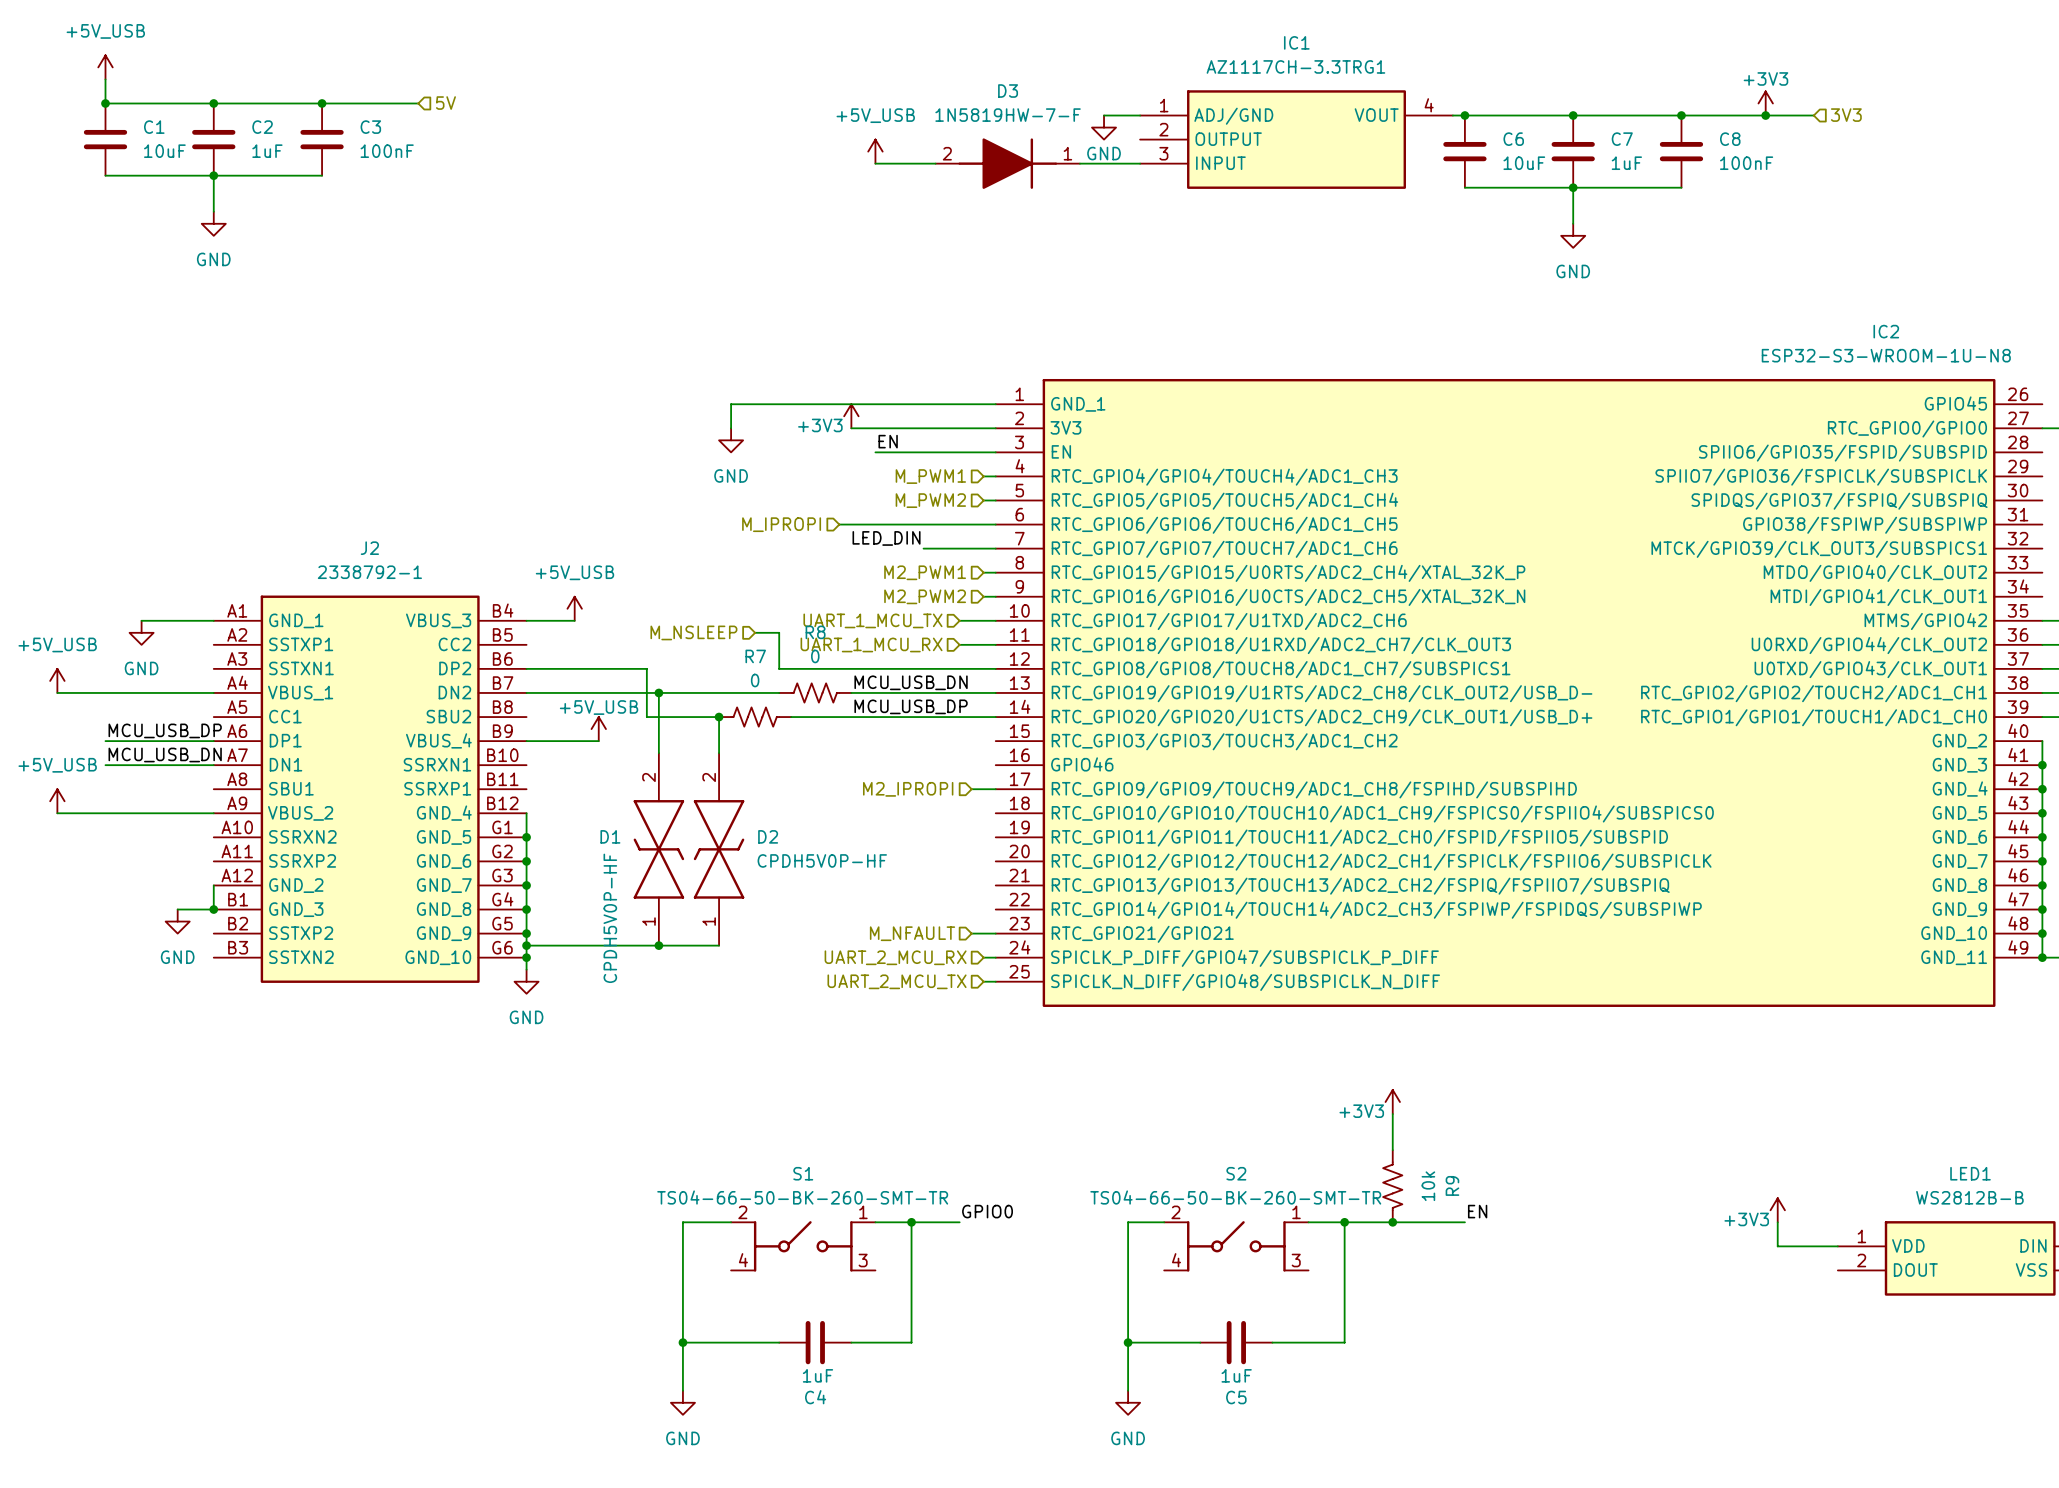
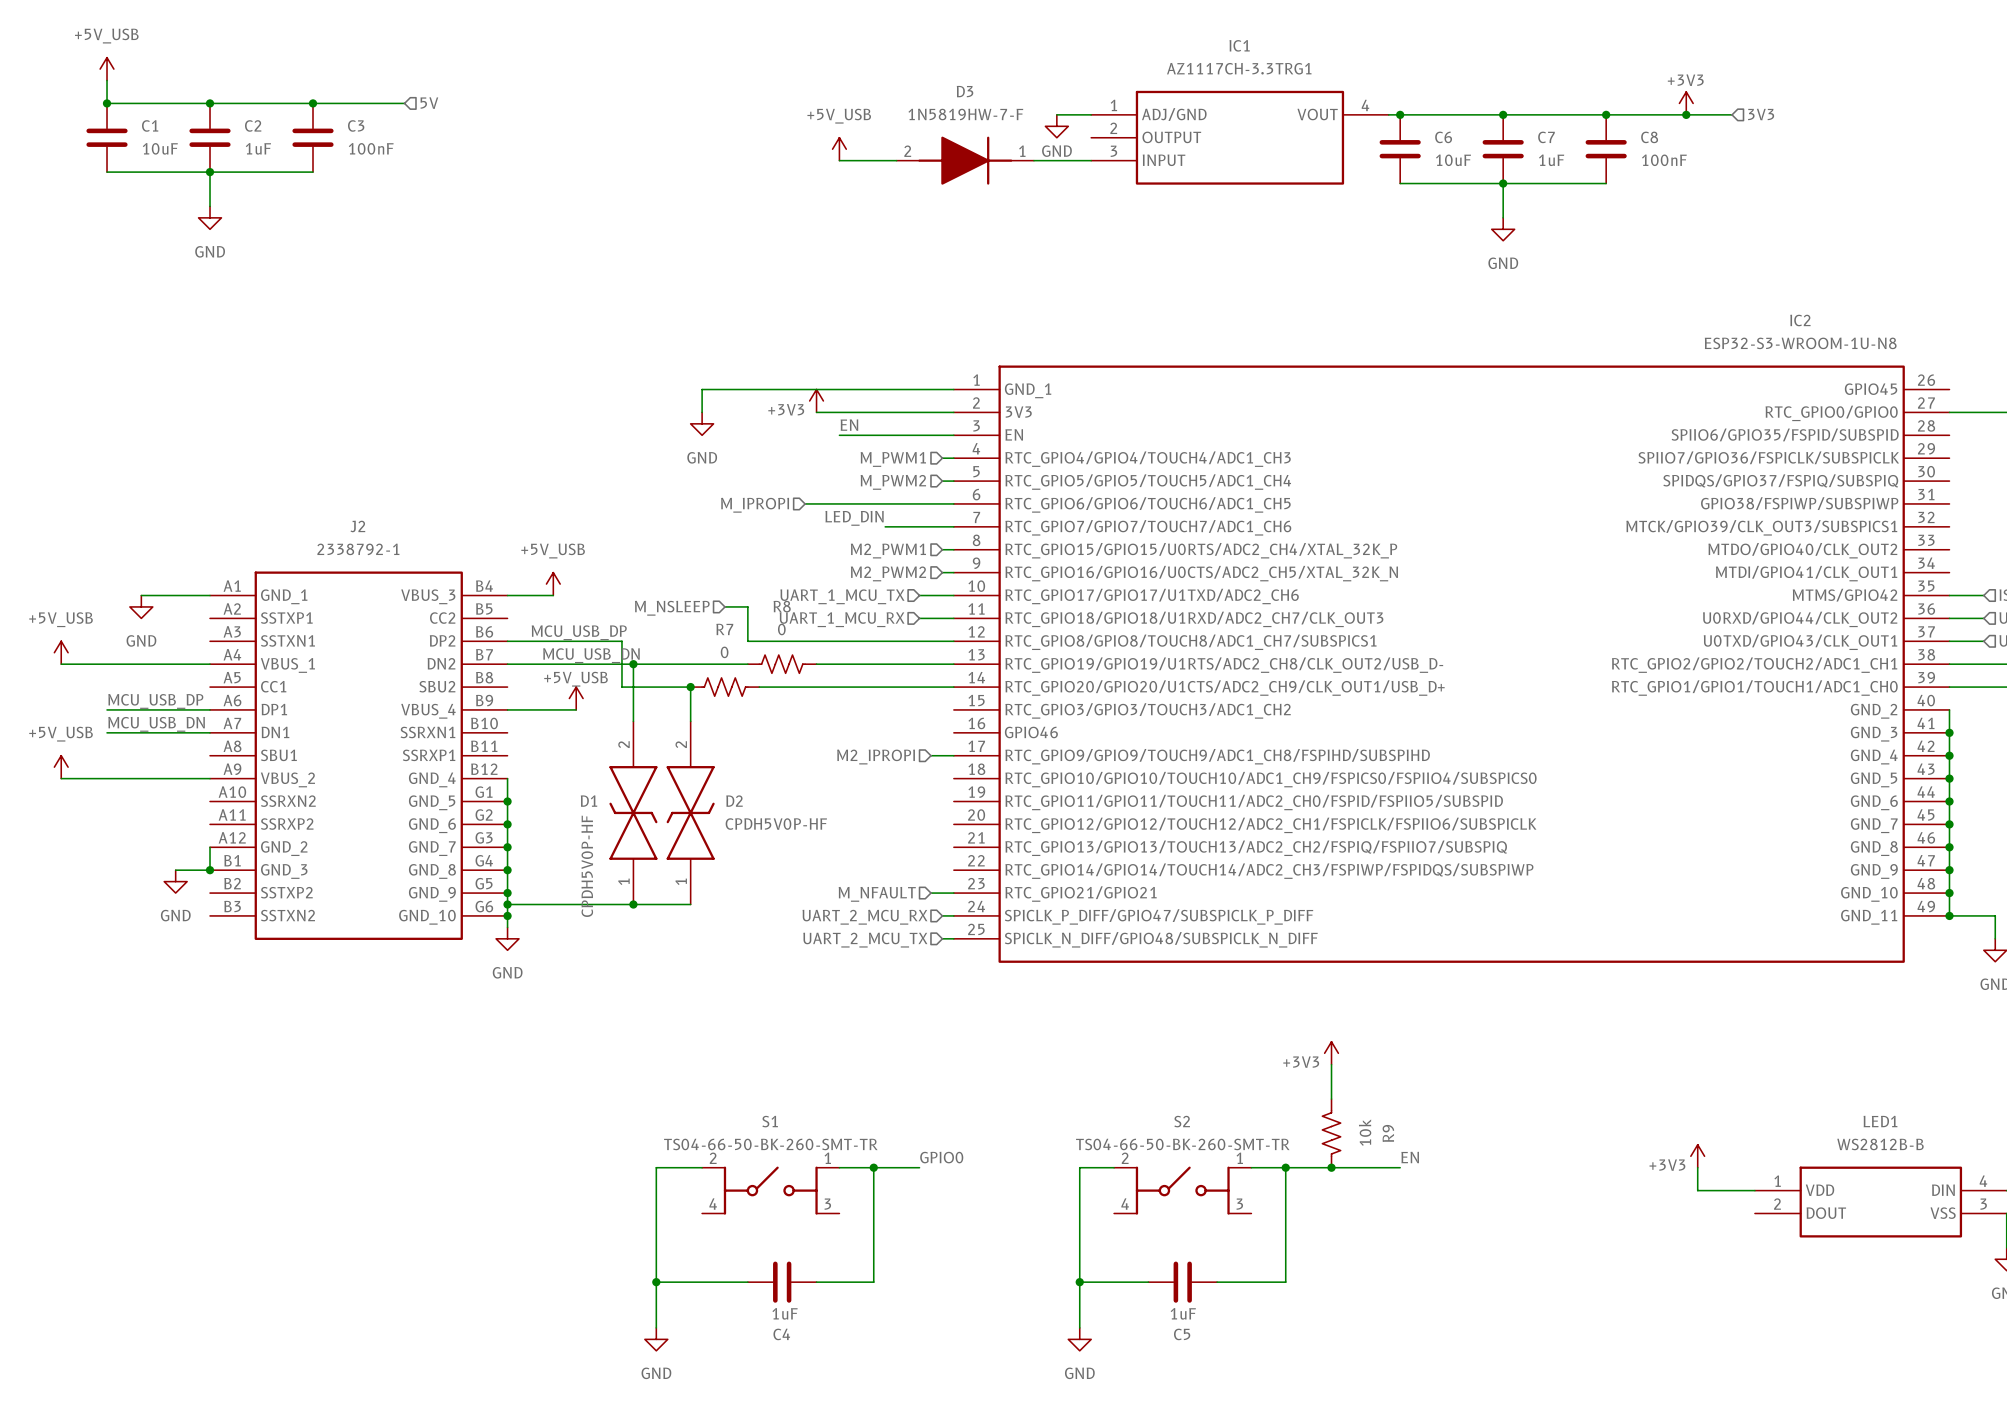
label: none -> MCU_USB_DP (579, 632)
label: none -> MCU_USB_DN (591, 655)
label: MCU_USB_DN (911, 682) -> none
label: MCU_USB_DP (911, 706) -> none

